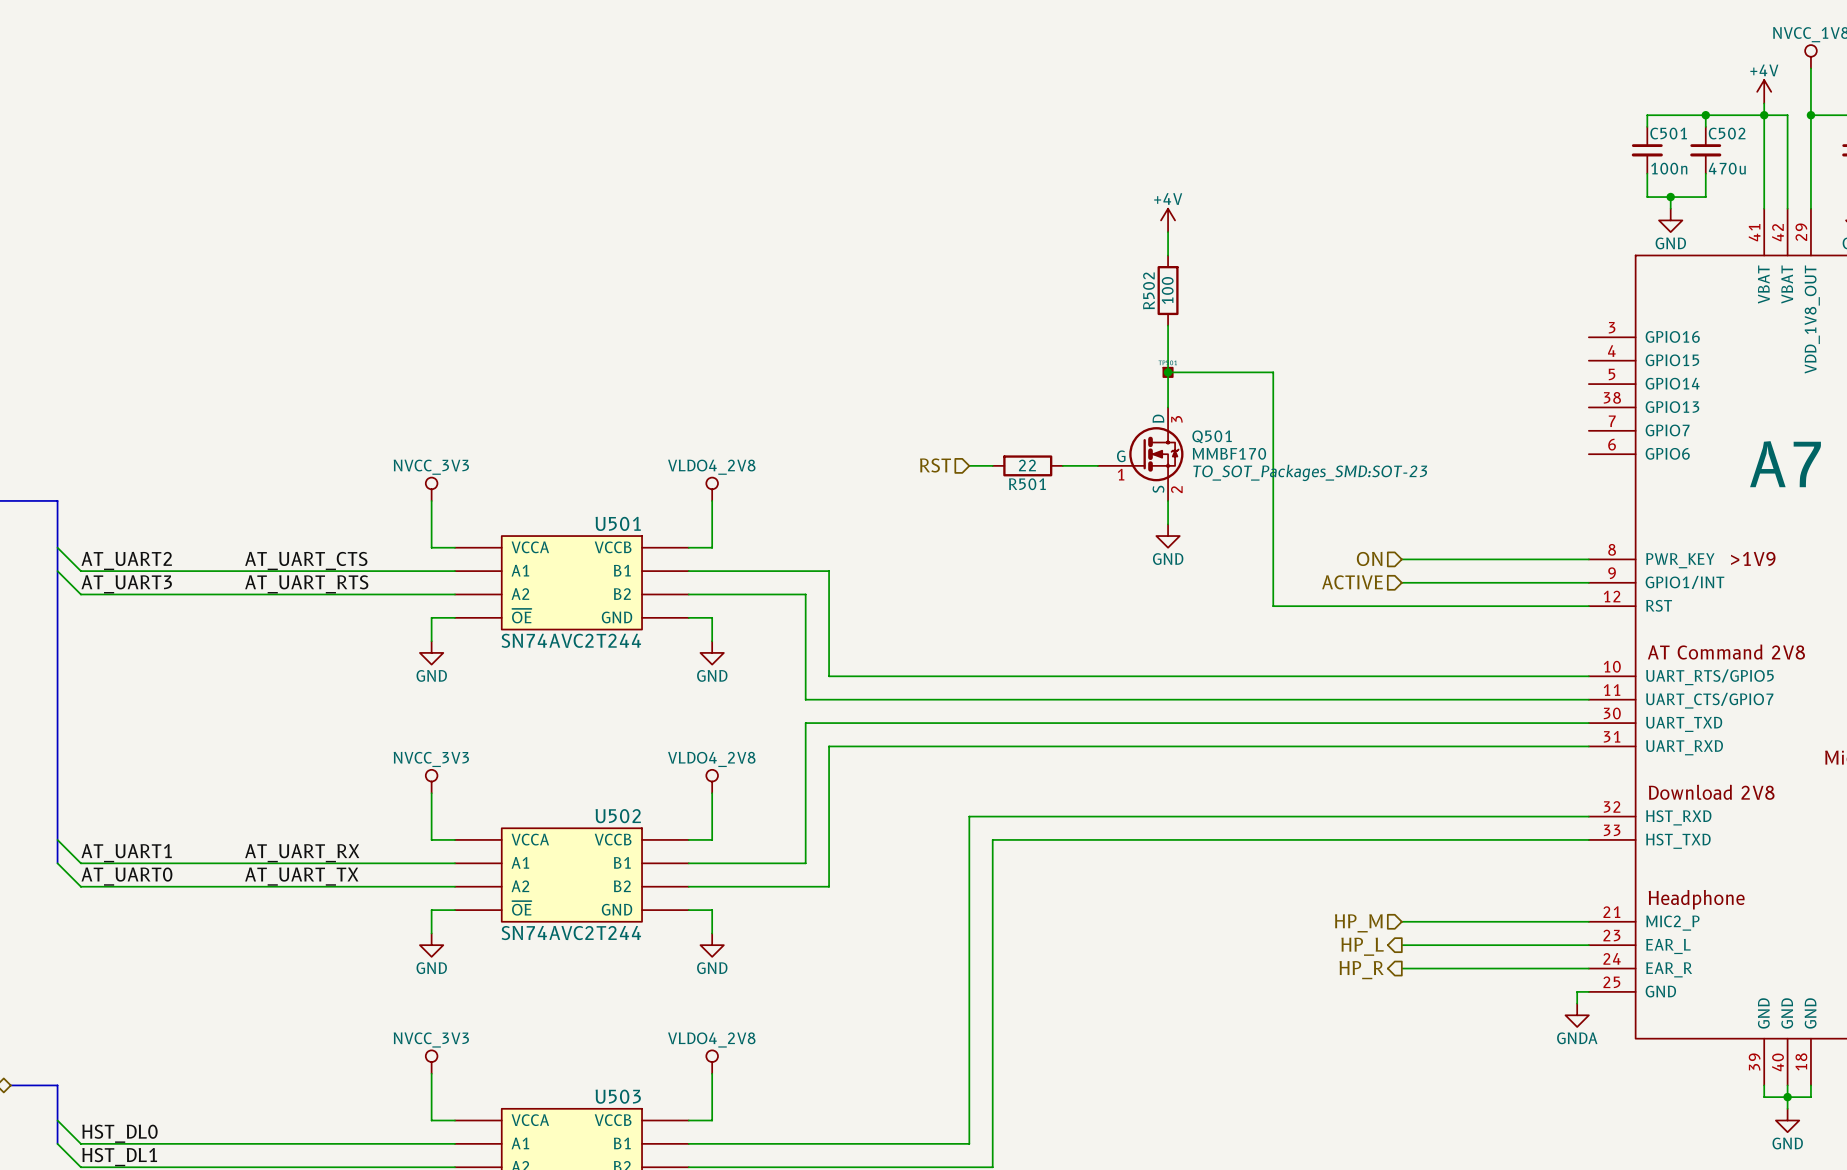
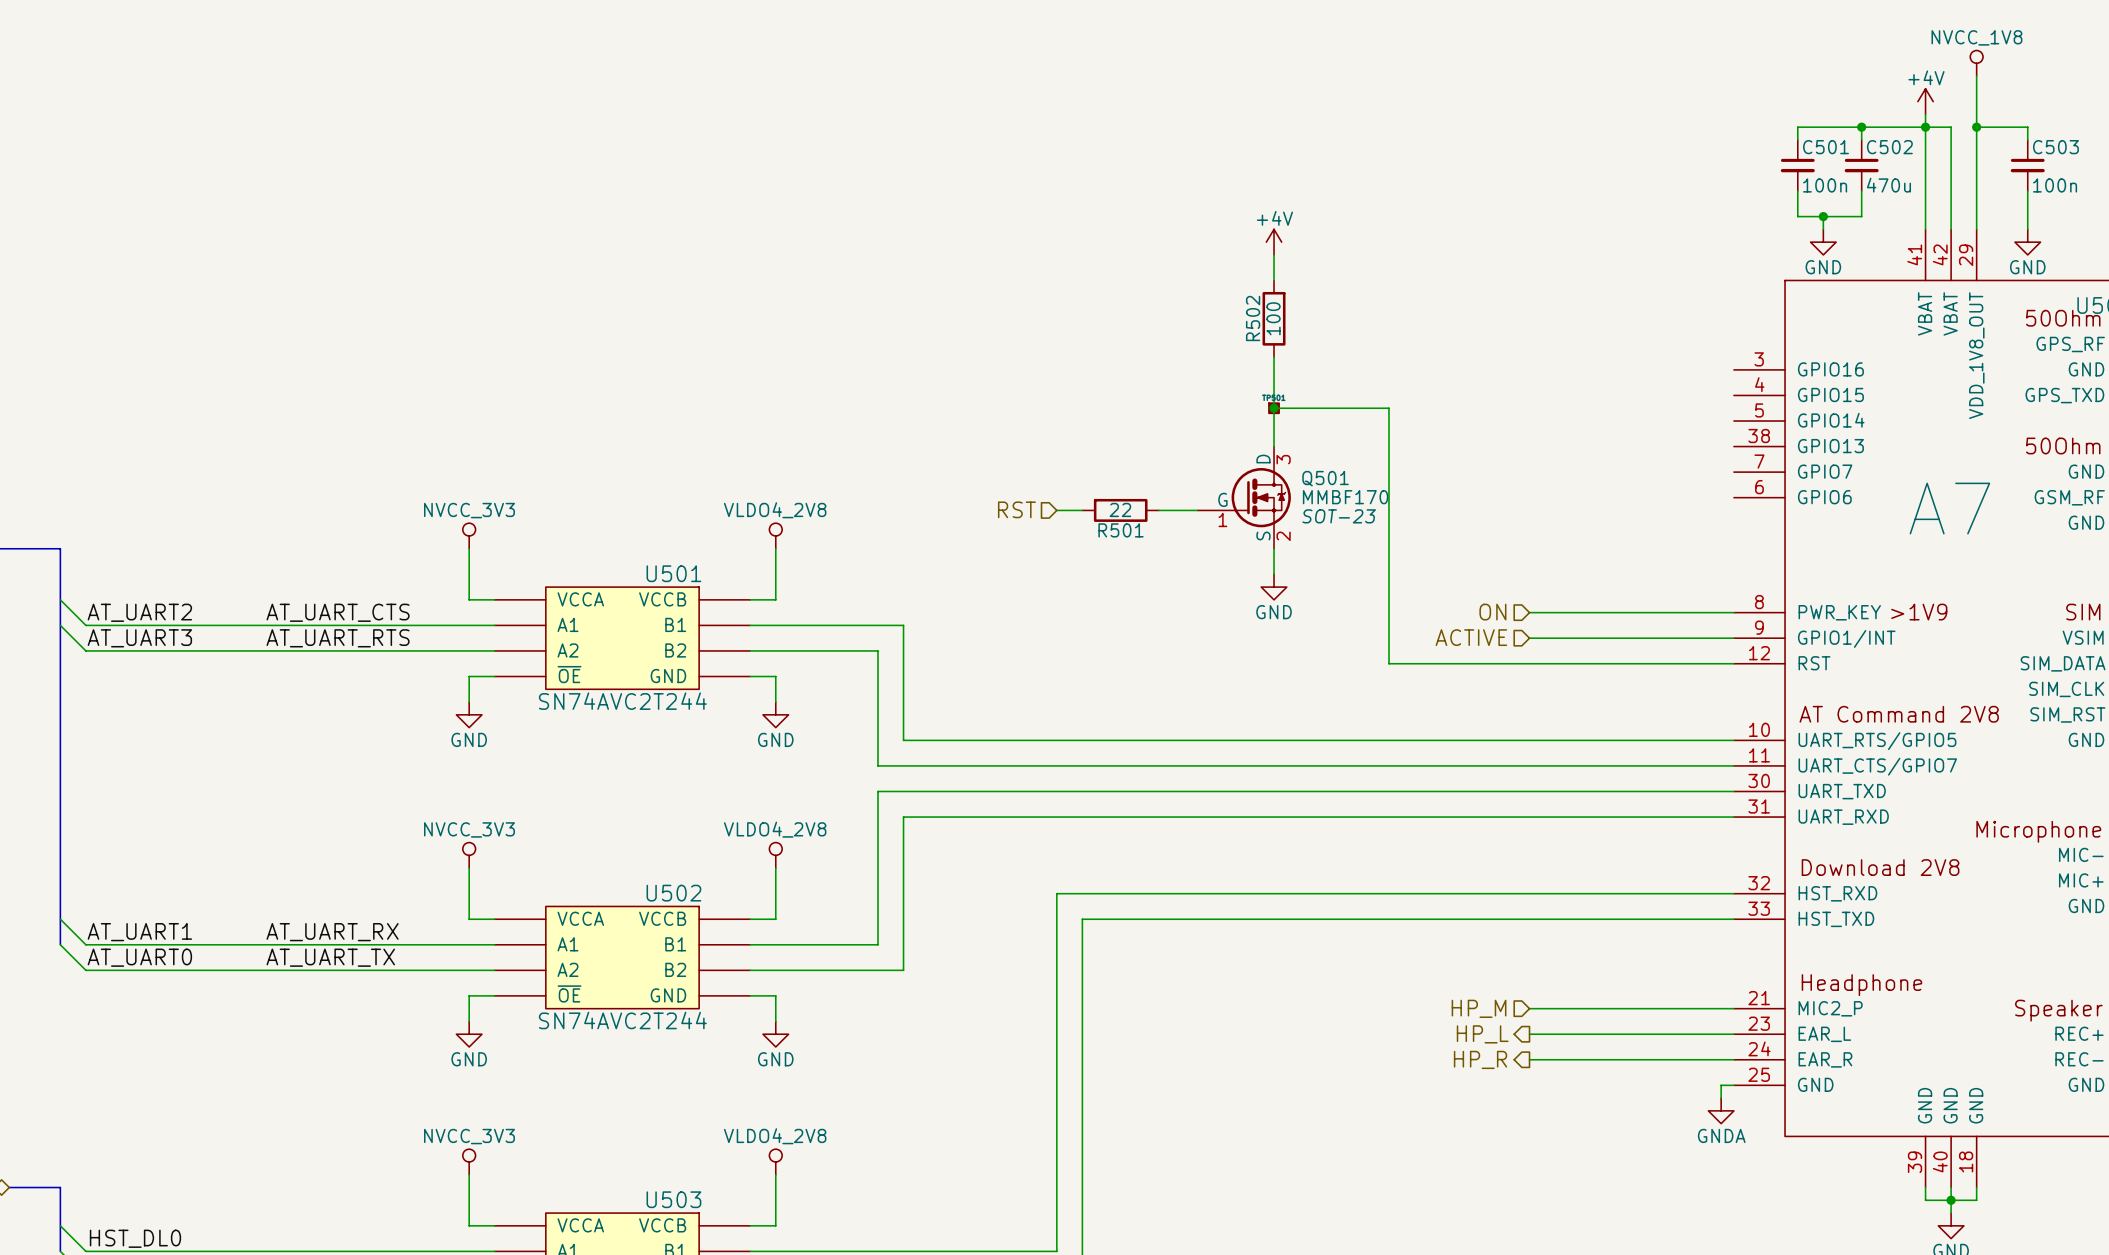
Q501 text: TO_SOT_Packages_SMD:SOT-23 (1310, 472) -> SOT-23 (1339, 516)

